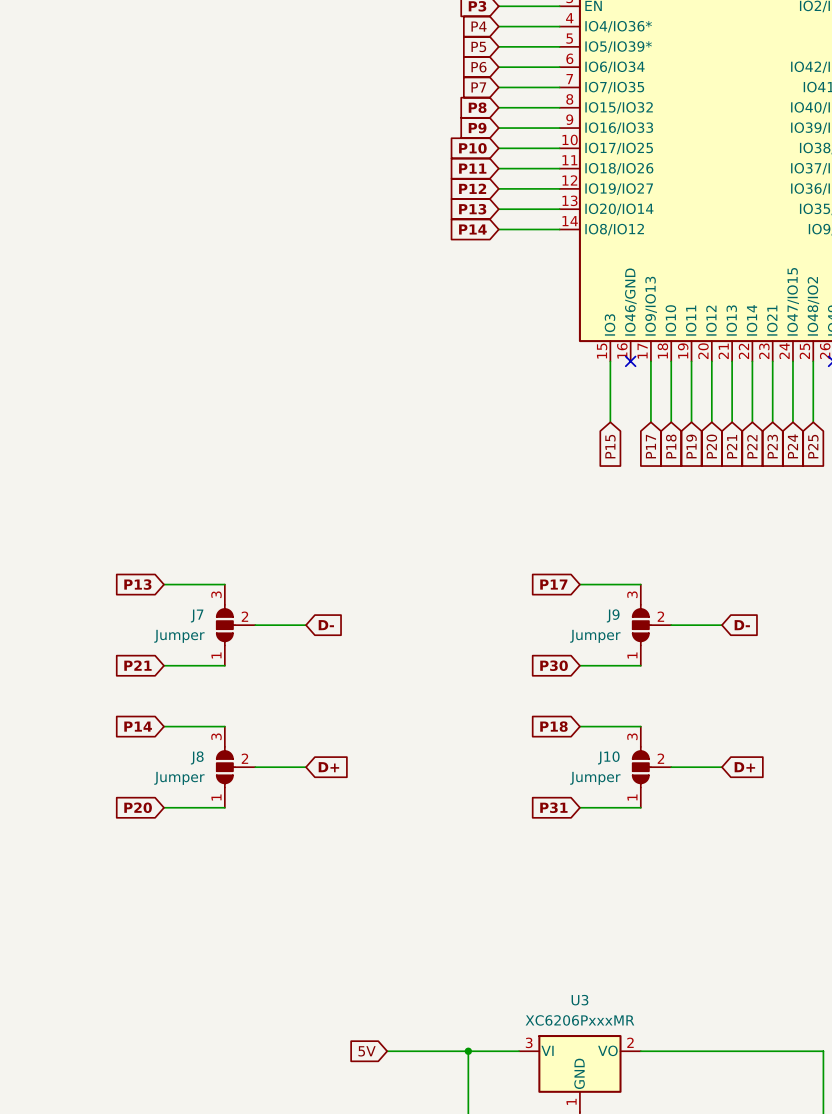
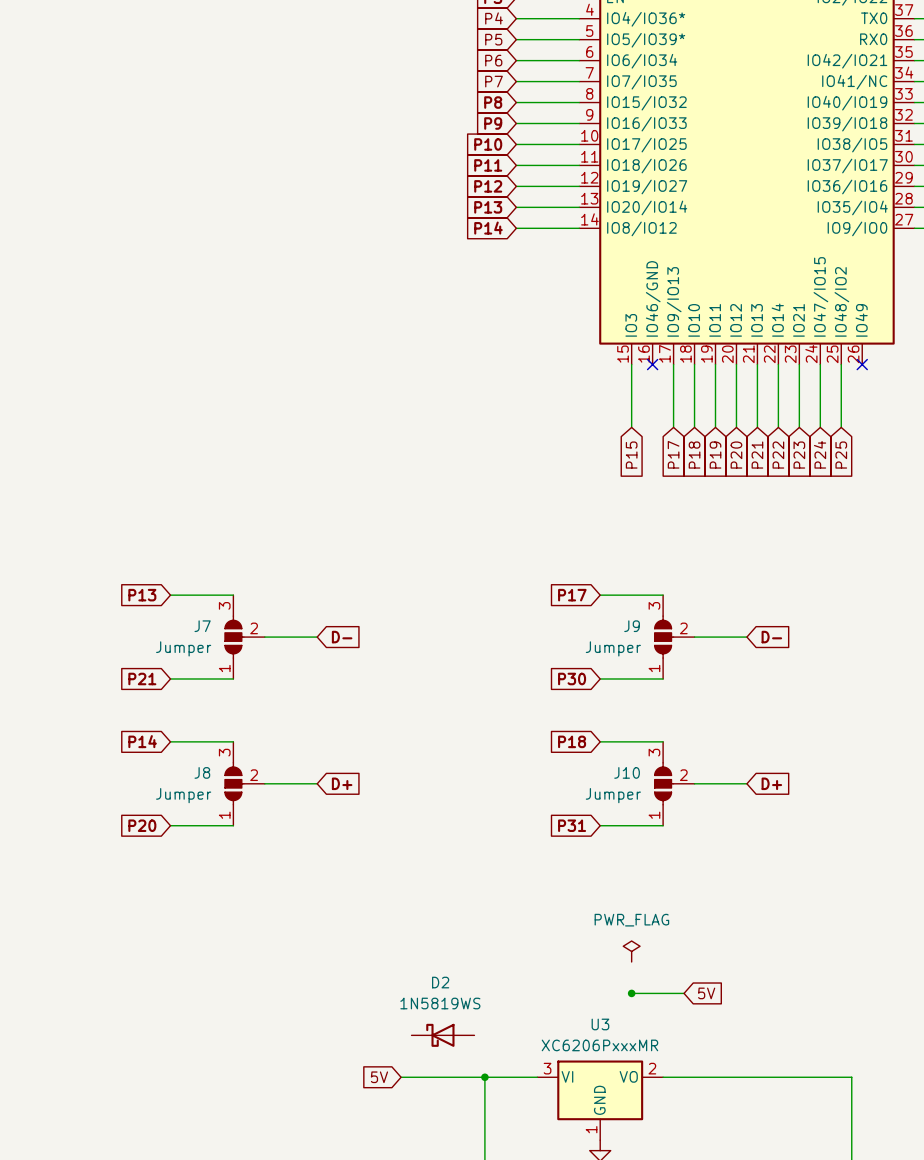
power symbol: none -> PWR_FLAG (631, 951)
wire: none -> (631, 993) (684, 993)
junction: none -> (631, 993)
global label: none -> 5V (706, 993)
D2: none -> 1N5819WS (442, 1035)

